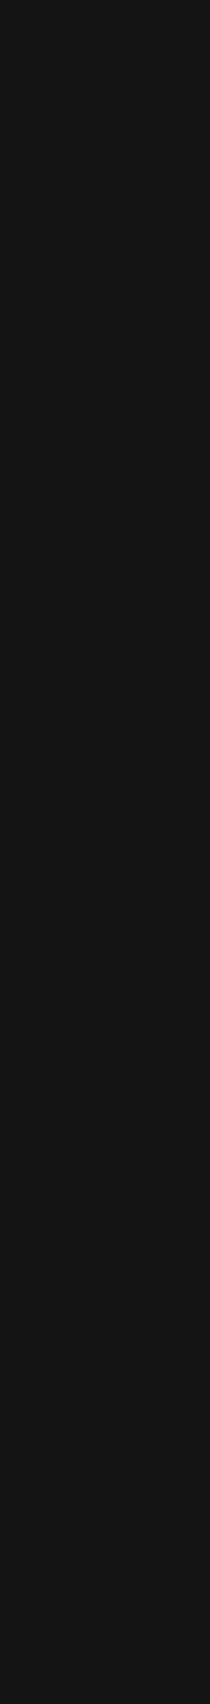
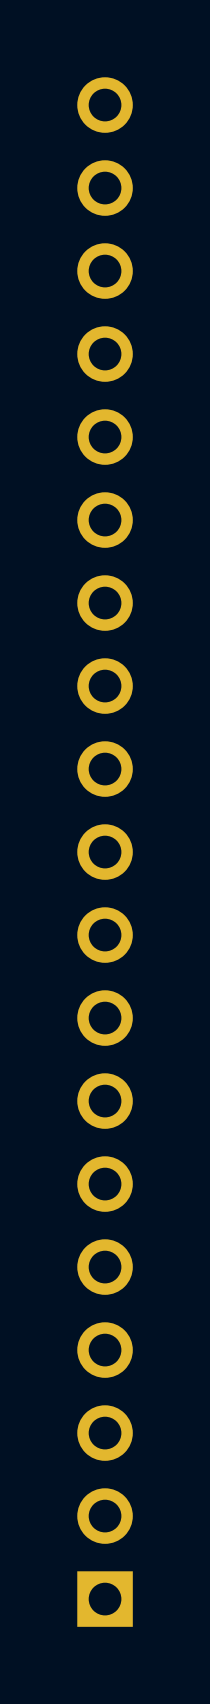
part: none -> (105, 852)

